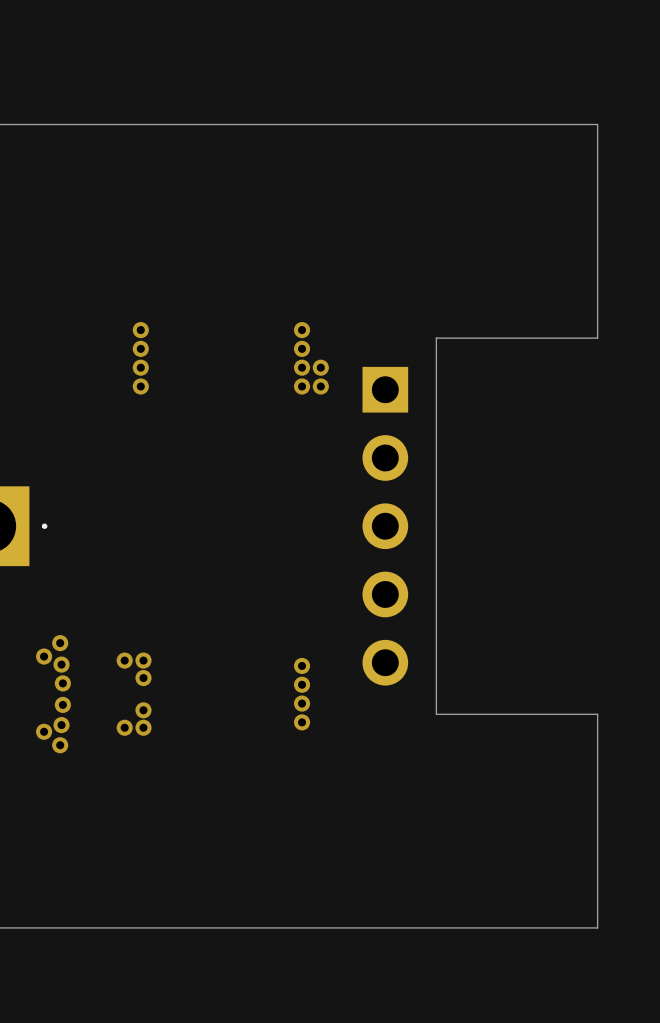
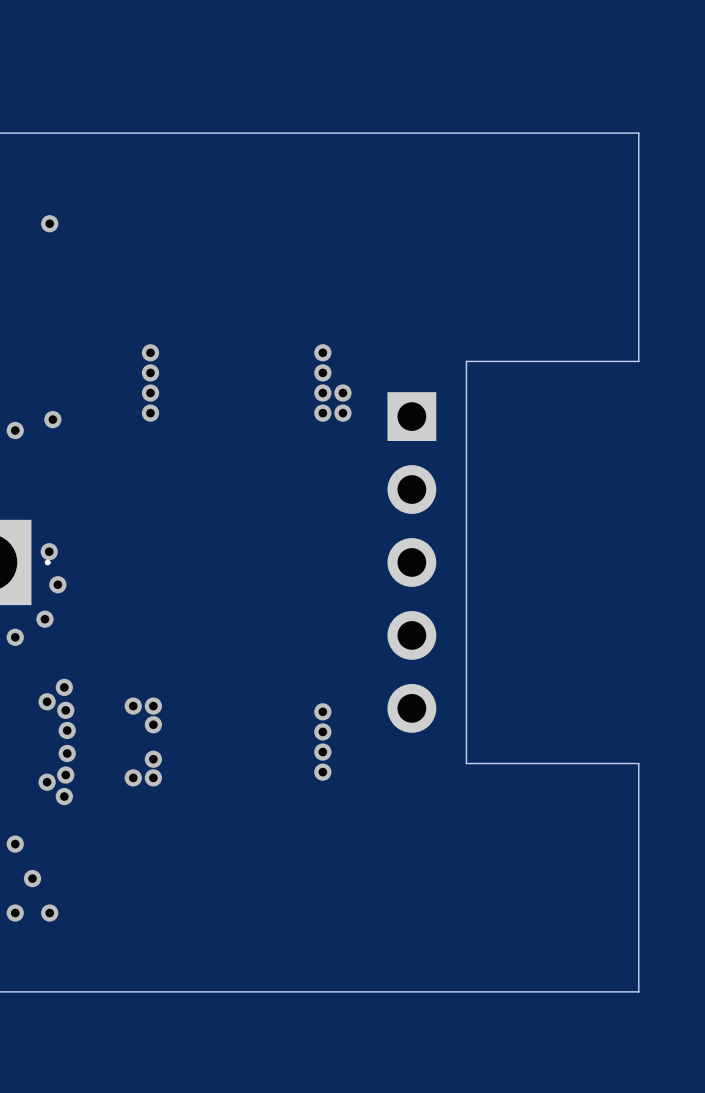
via: none -> (49, 223)
via: none -> (52, 419)
via: none -> (15, 430)
via: none -> (49, 551)
via: none -> (57, 584)
via: none -> (44, 619)
via: none -> (15, 637)
via: none -> (15, 844)
via: none -> (32, 878)
via: none -> (15, 913)
via: none -> (49, 913)

